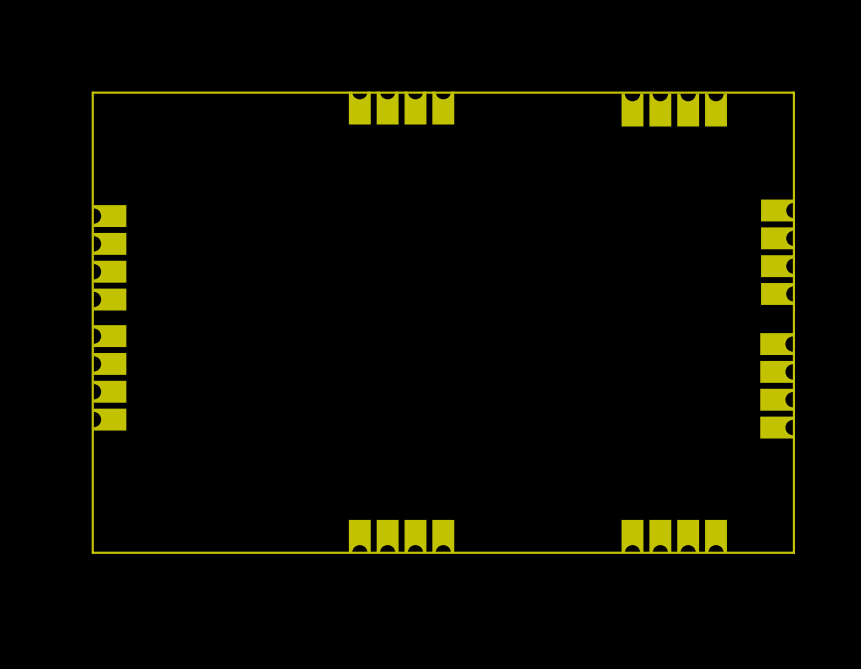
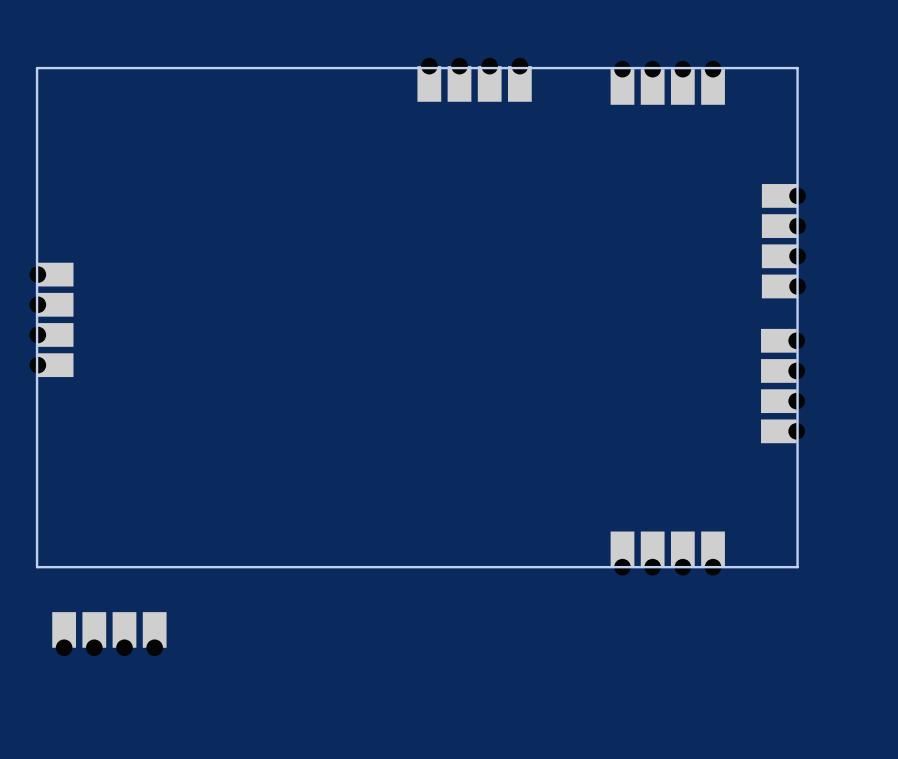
part position: (401, 104) -> (474, 79)
part: (106, 257) -> none
part: none -> (51, 319)
part: (106, 377) -> none
part: (401, 540) -> none
part: none -> (109, 634)

